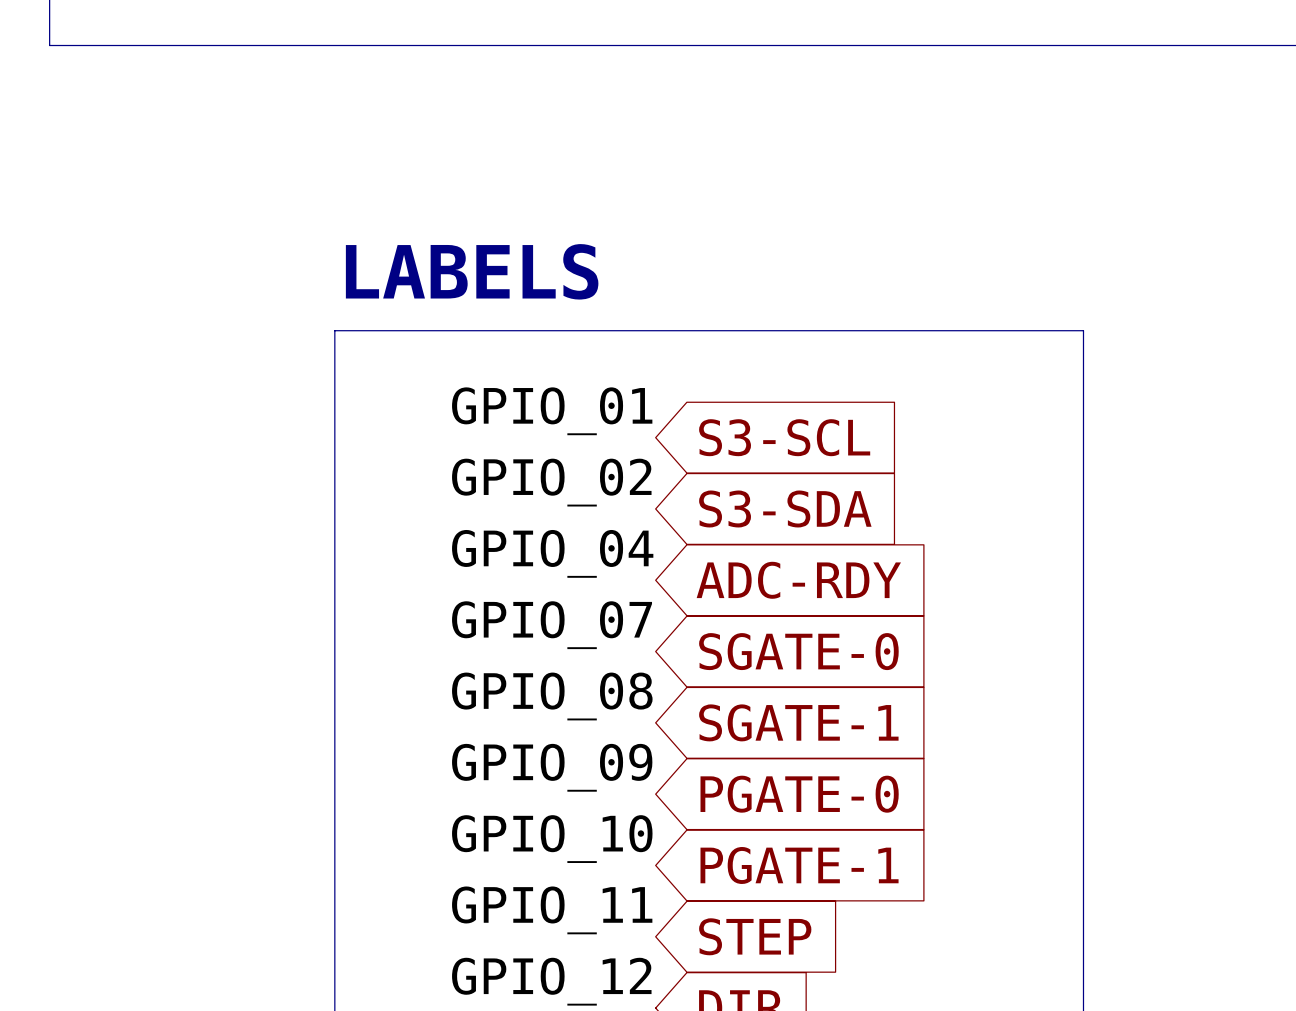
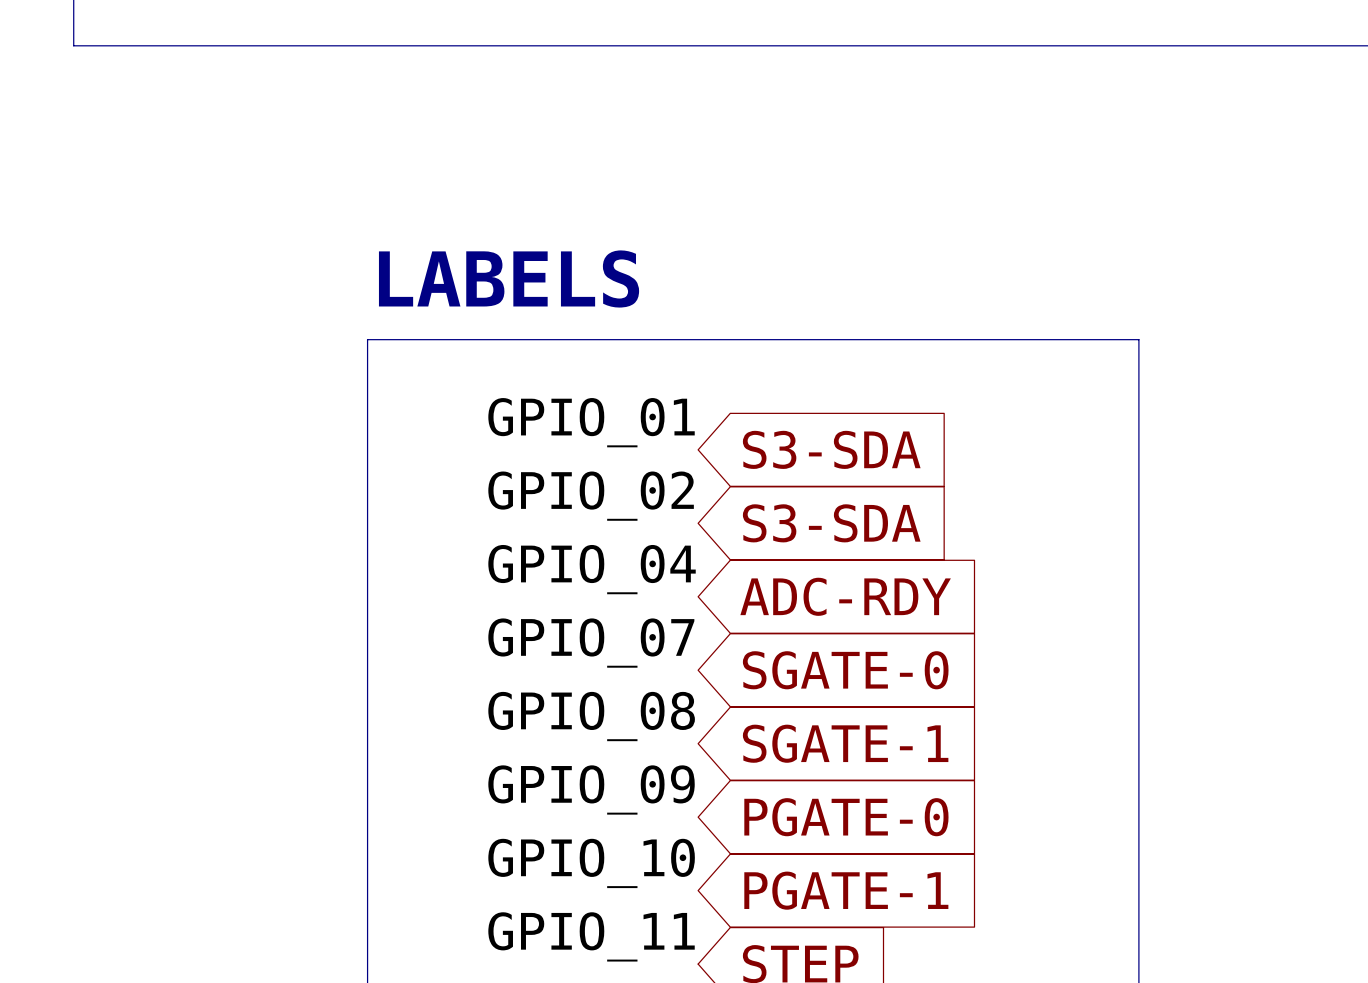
global label: S3-SCL (784, 437) -> S3-SDA (831, 449)

